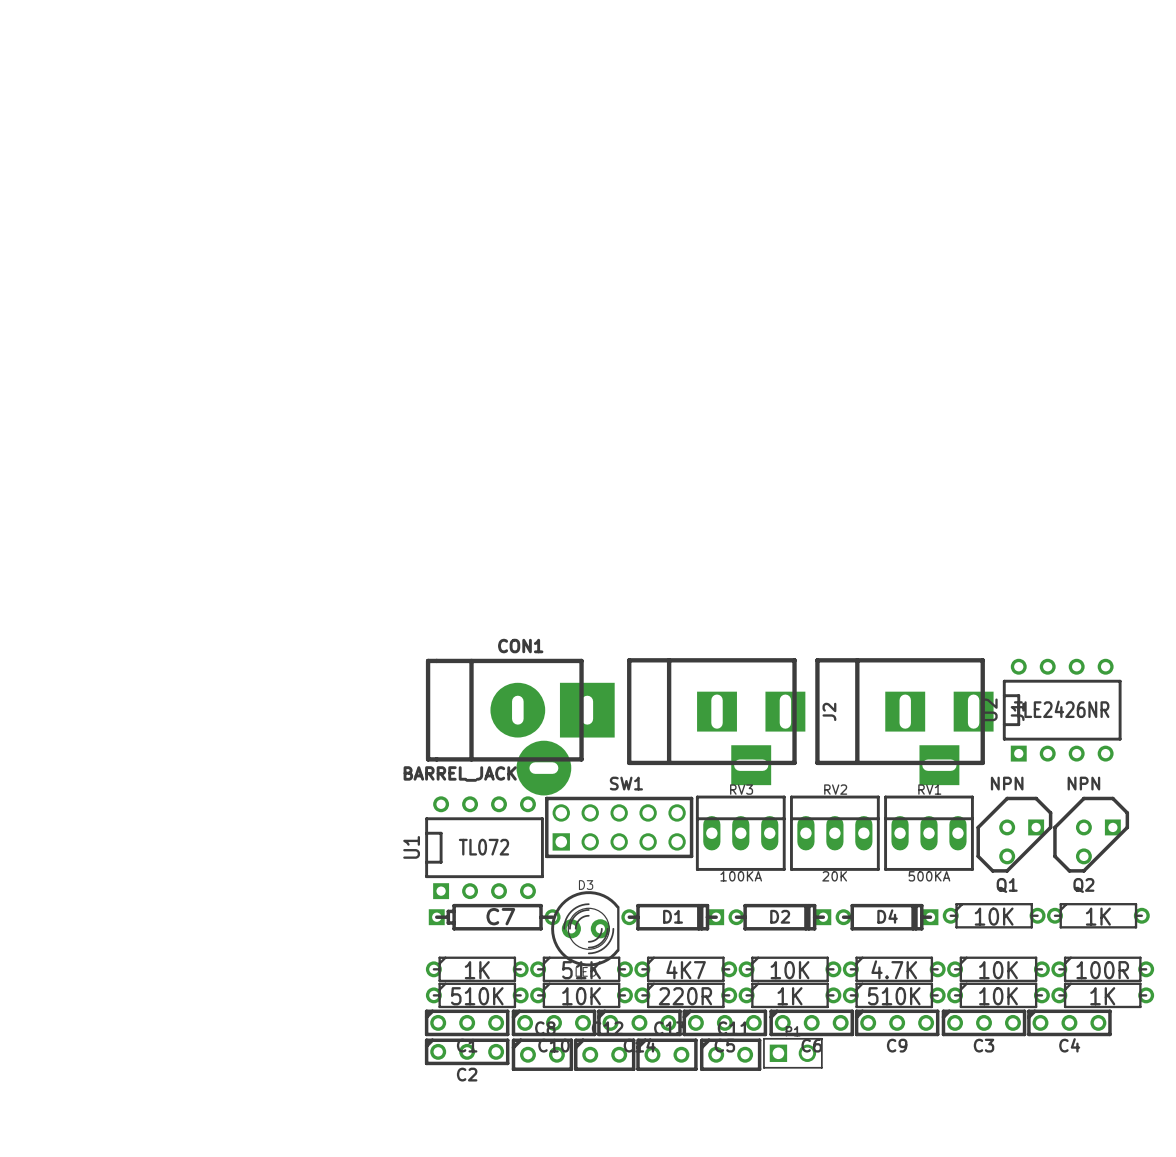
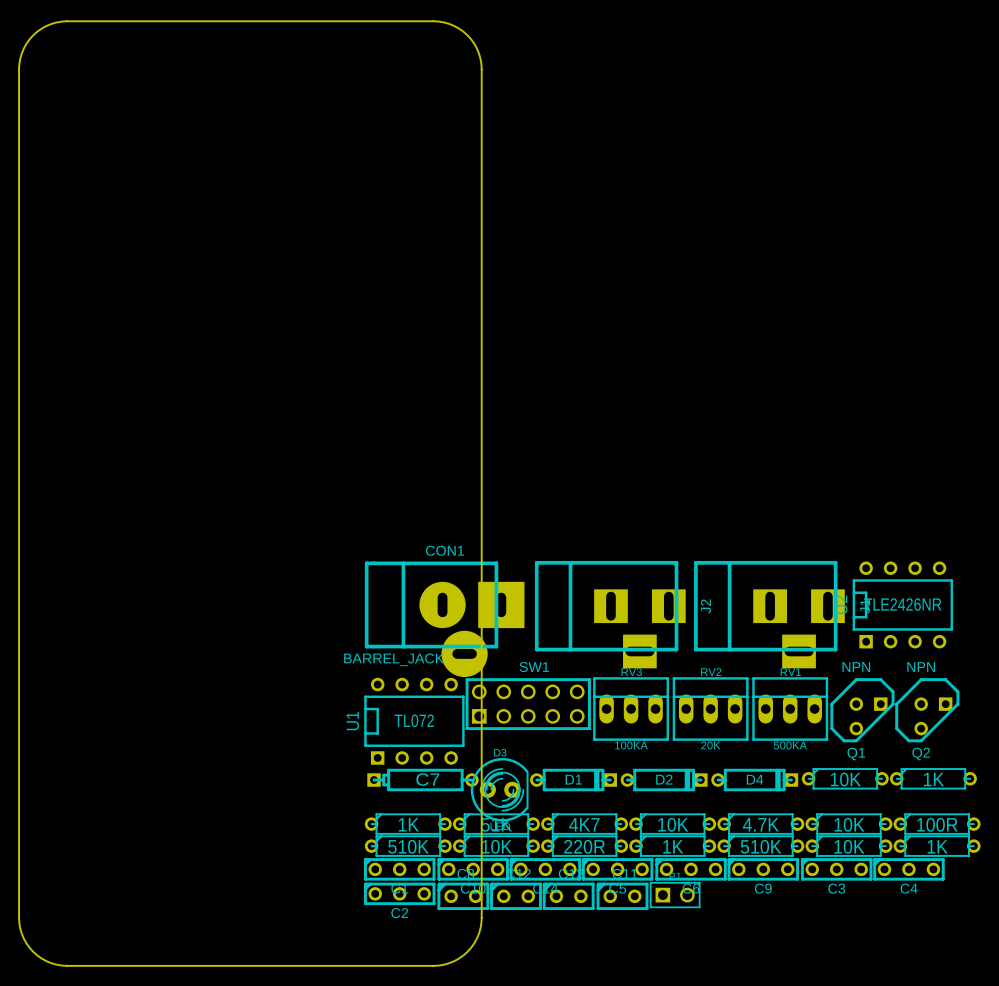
board edge: none -> (67, 21) (438, 21) (454, 26) (463, 31) (471, 39) (479, 53) (481, 69) (481, 917) (479, 933) (471, 947) (463, 955) (449, 963) (433, 965) (61, 965) (46, 961) (37, 955) (29, 947) (21, 933) (19, 917) (19, 69) (23, 48) (33, 35) (46, 26) (67, 21)

